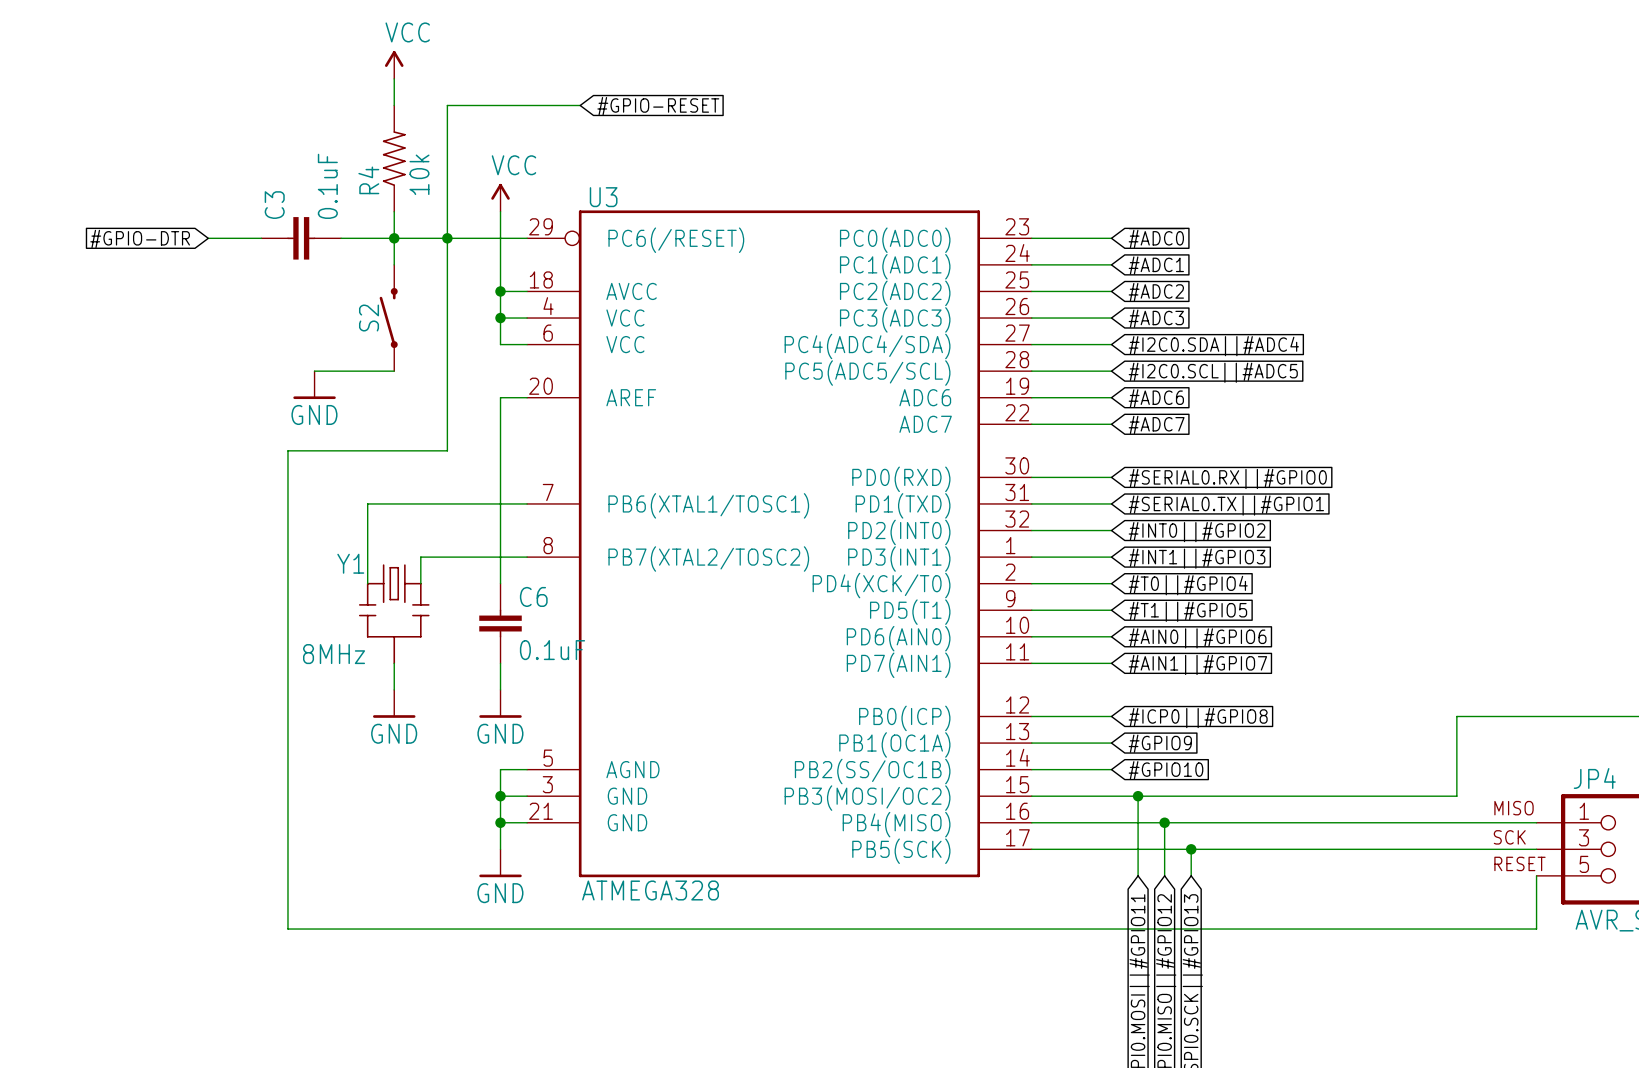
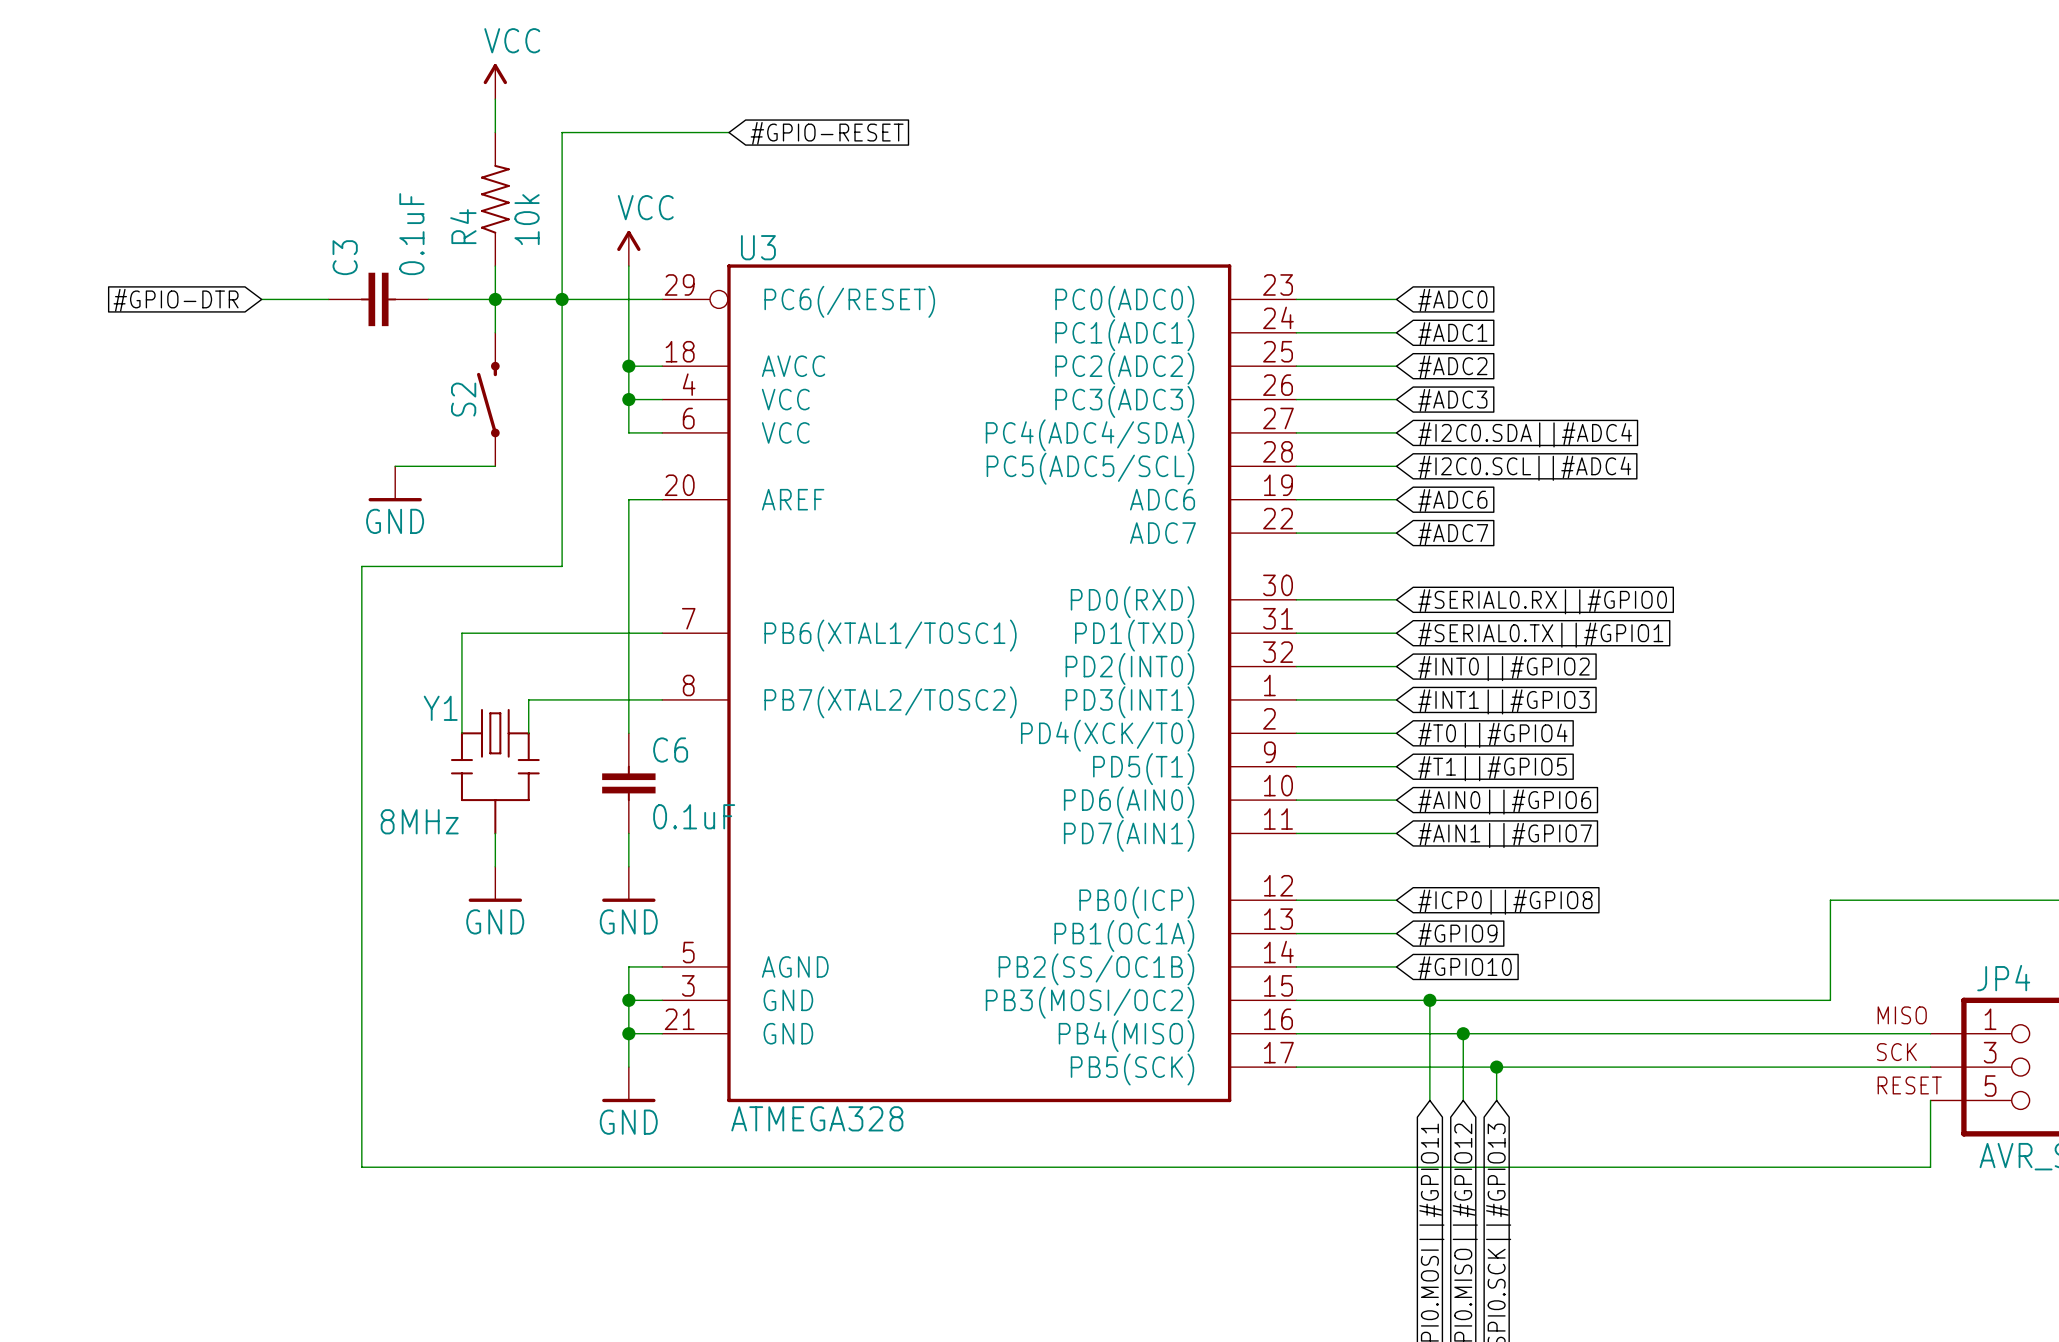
global label: ~{#ADC0} (1156, 238) -> #ADC0 (1452, 300)
global label: #I2C0.SCL||#ADC5 (1213, 372) -> #I2C0.SCL||#ADC4 (1524, 468)

